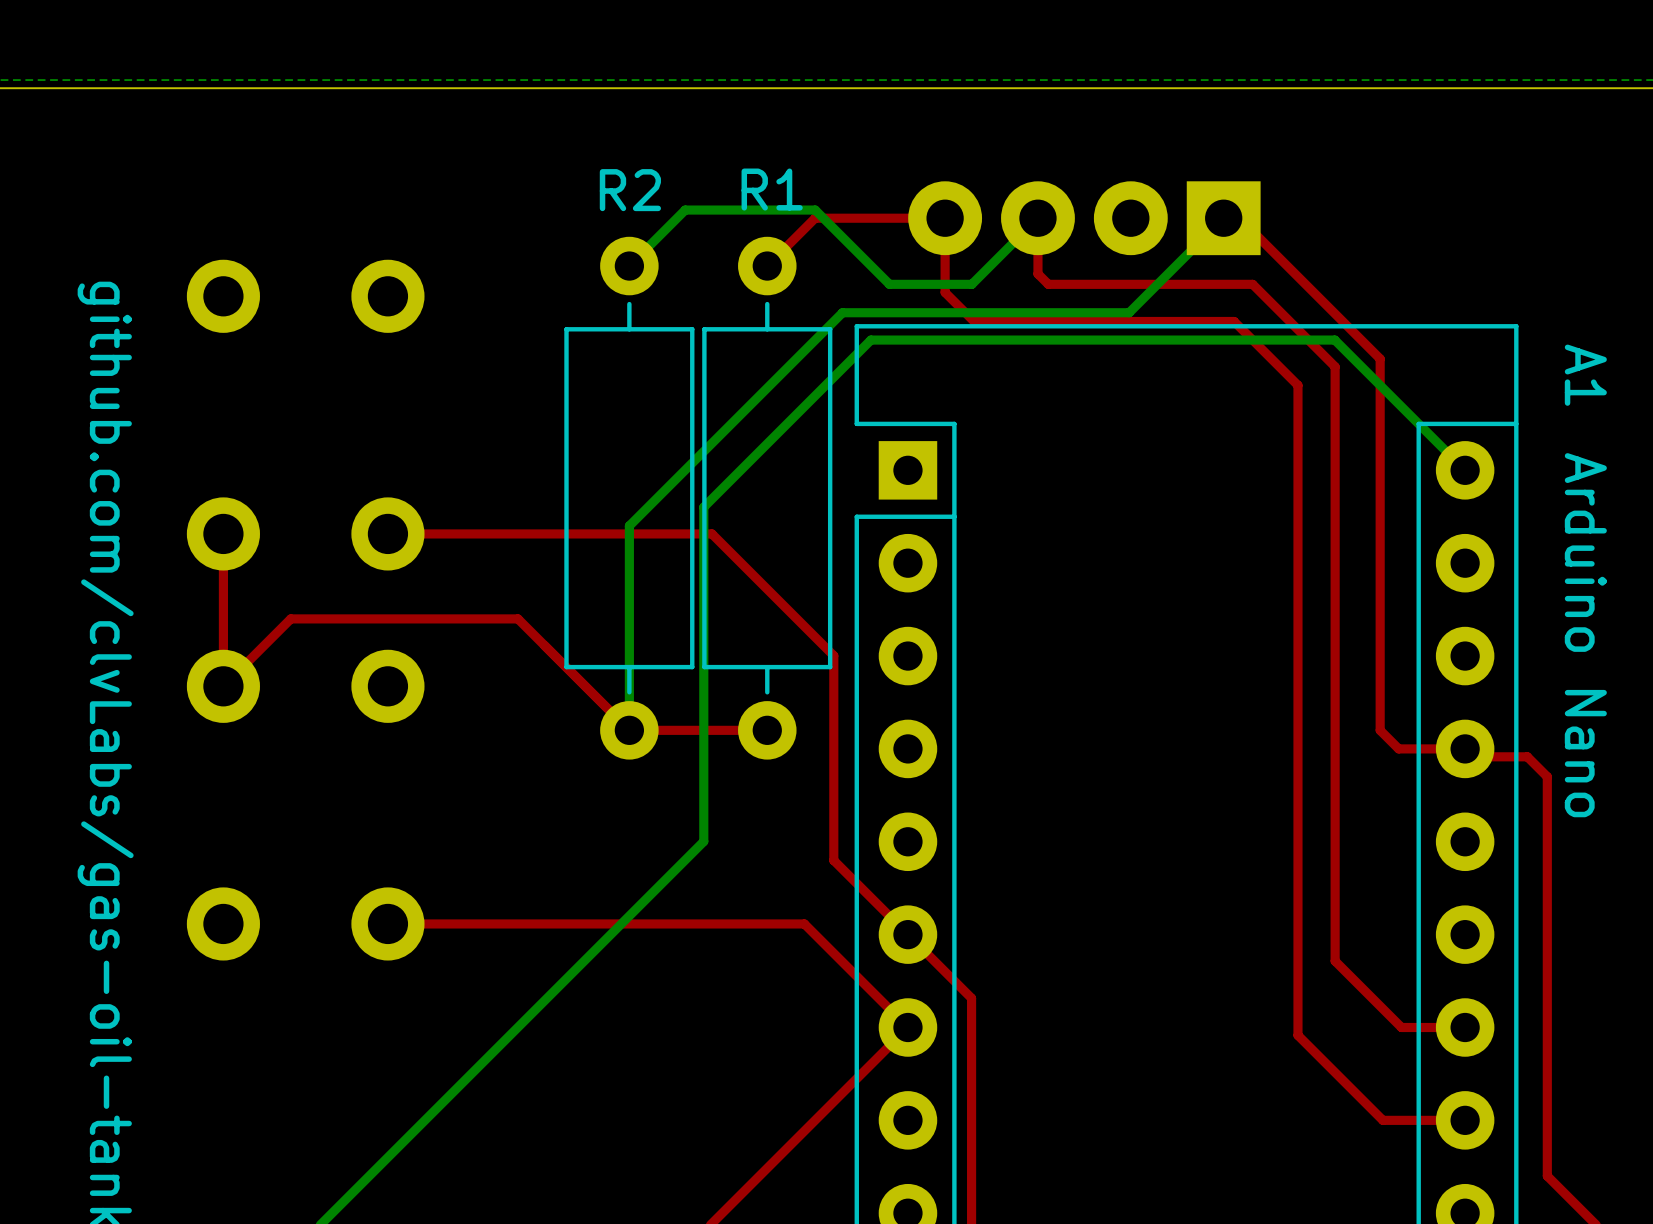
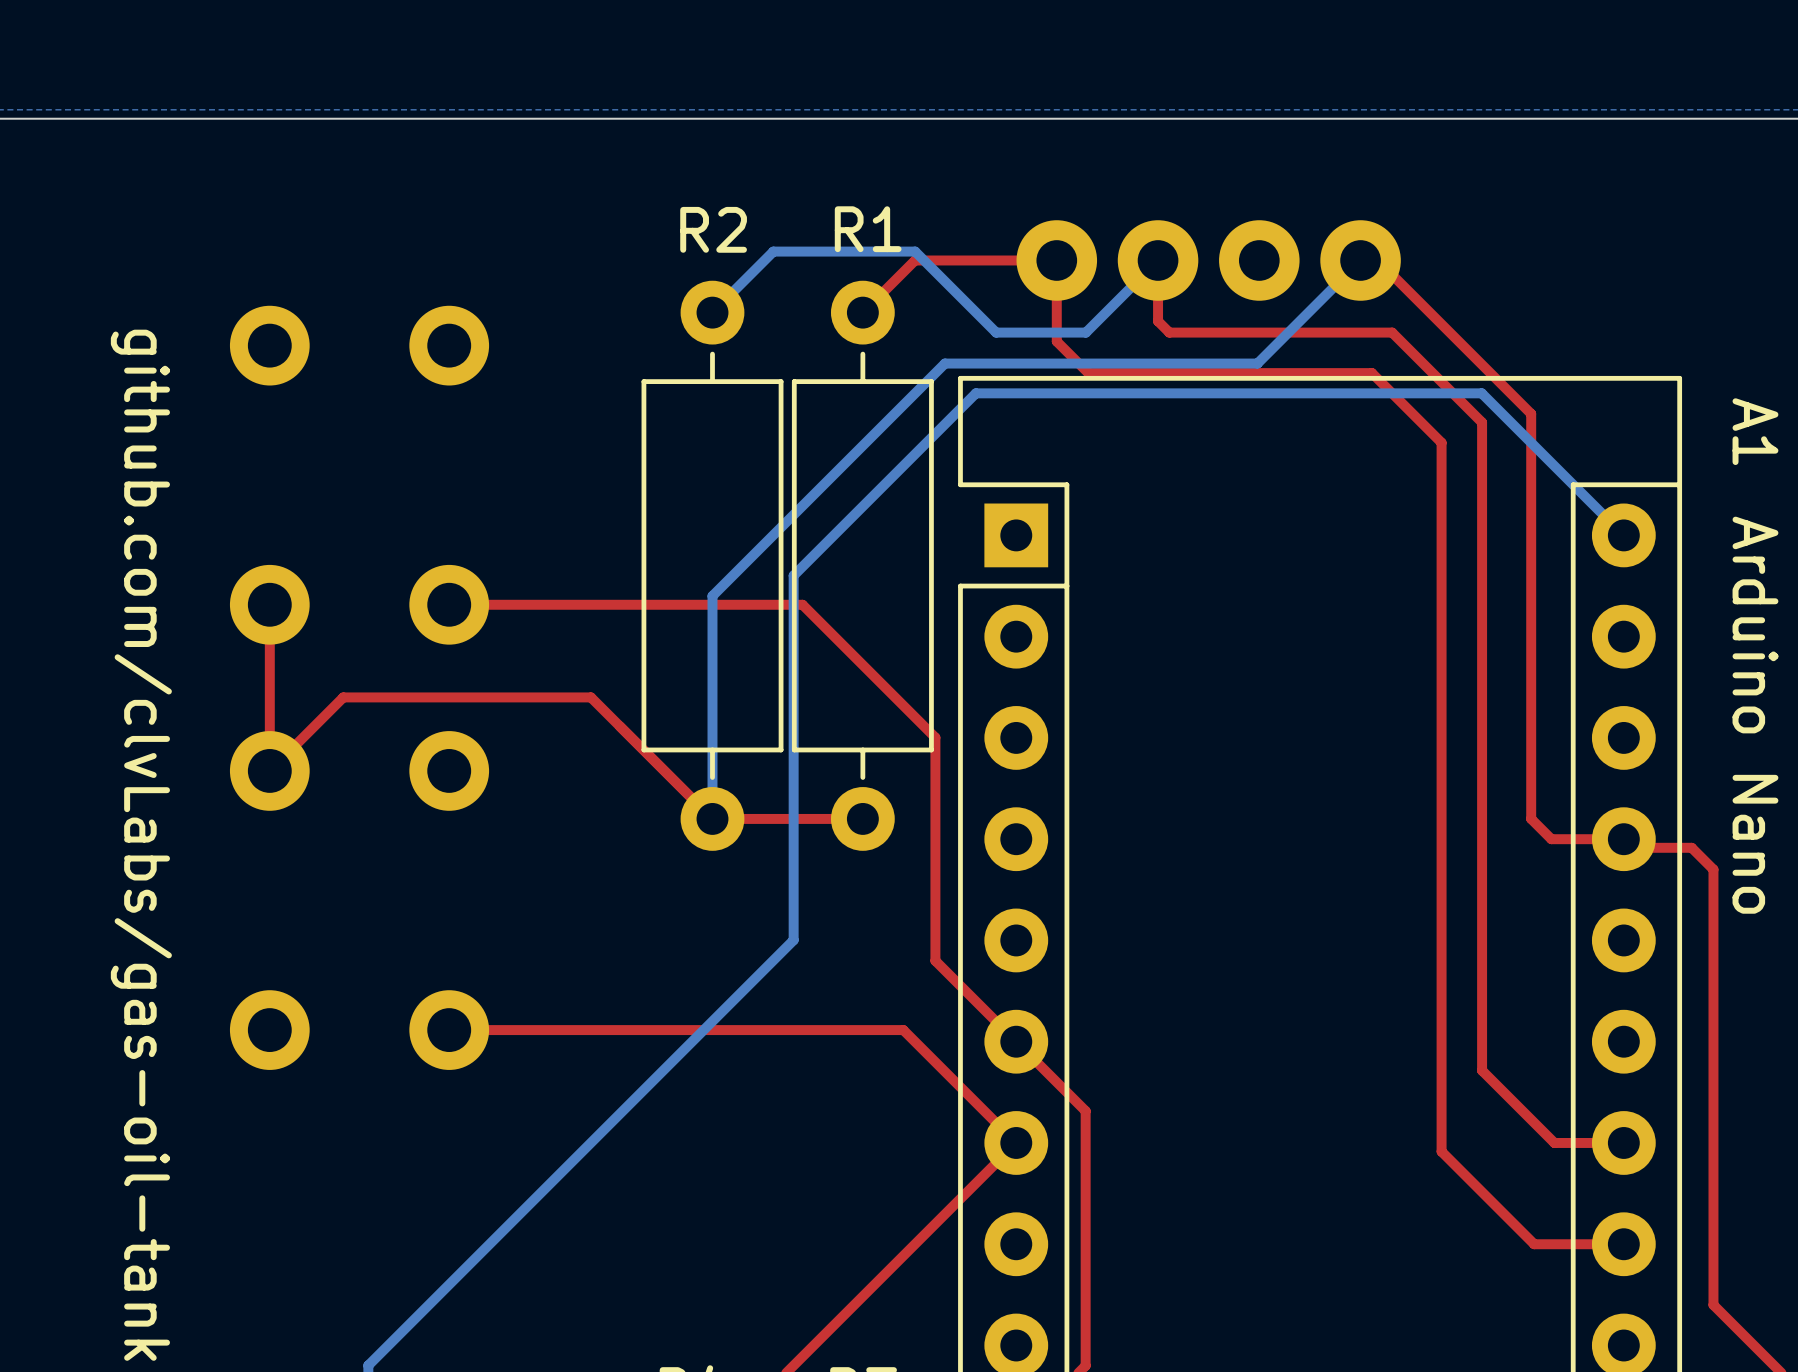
part footprint: [908, 181, 1261, 256] -> [1016, 220, 1401, 301]

